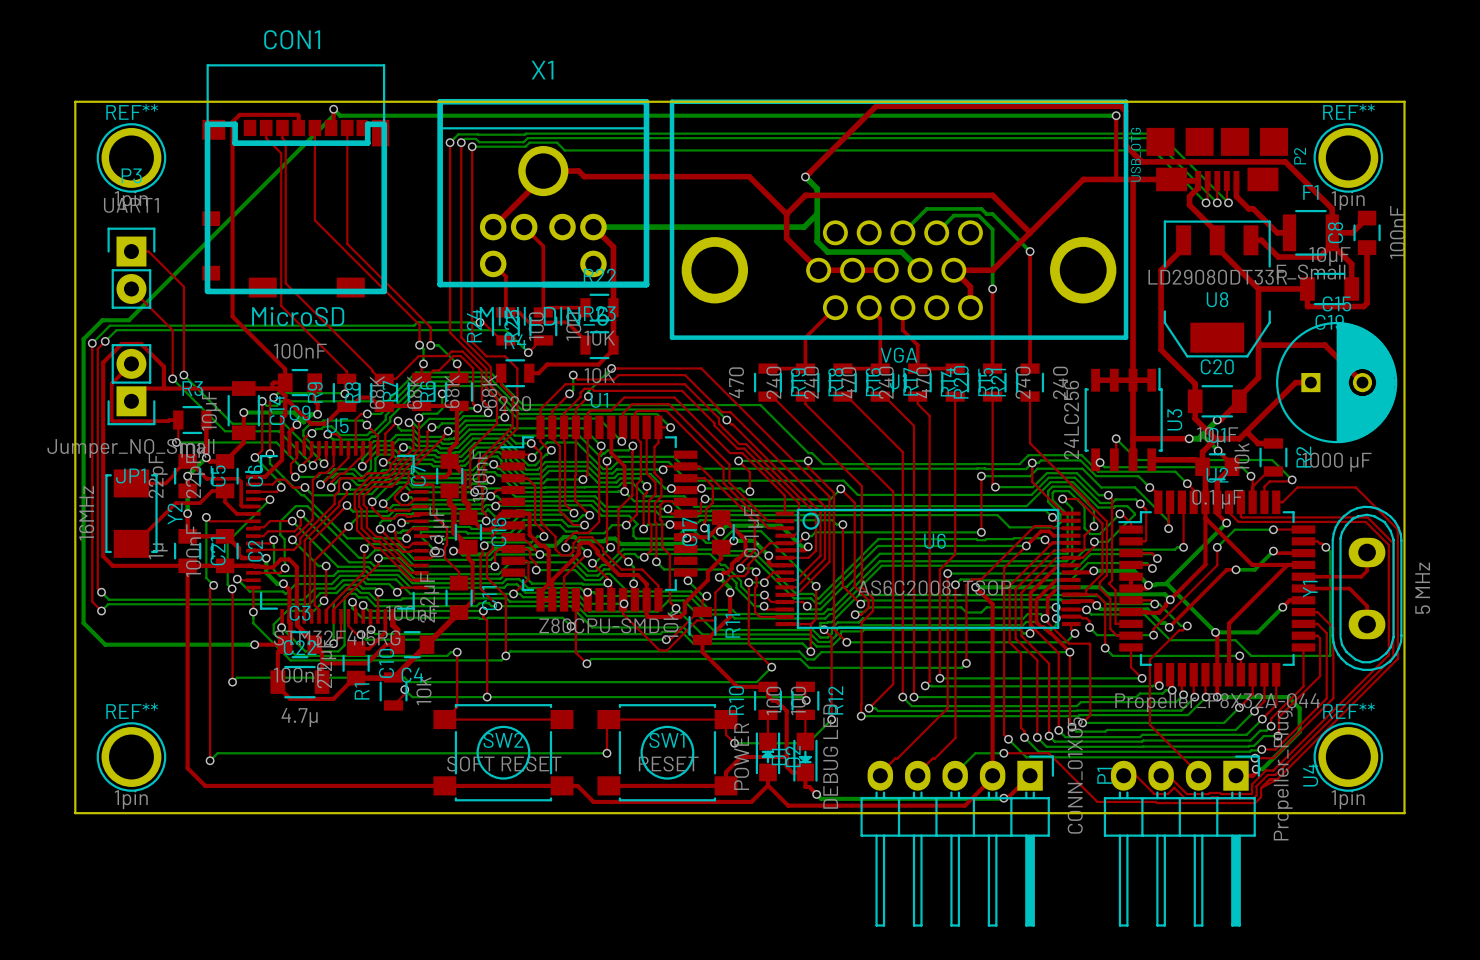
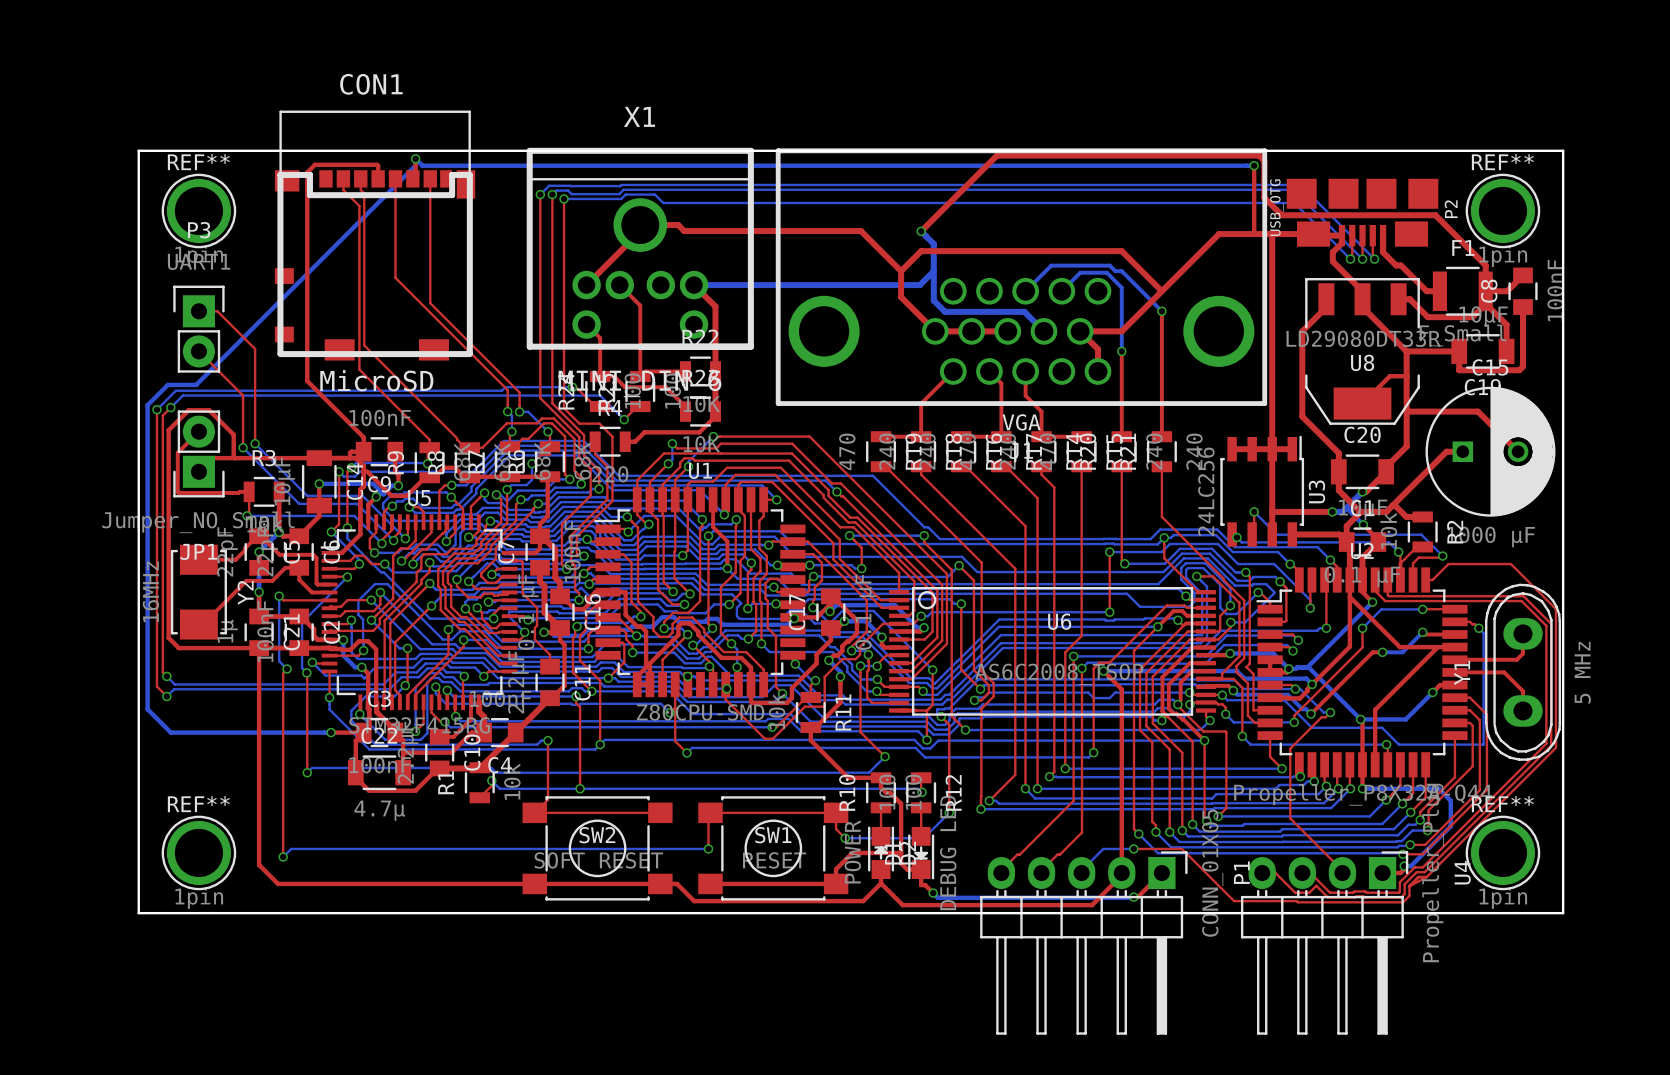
top track: none -> (1406, 376) (1389, 376) (1369, 396) (1369, 403)

